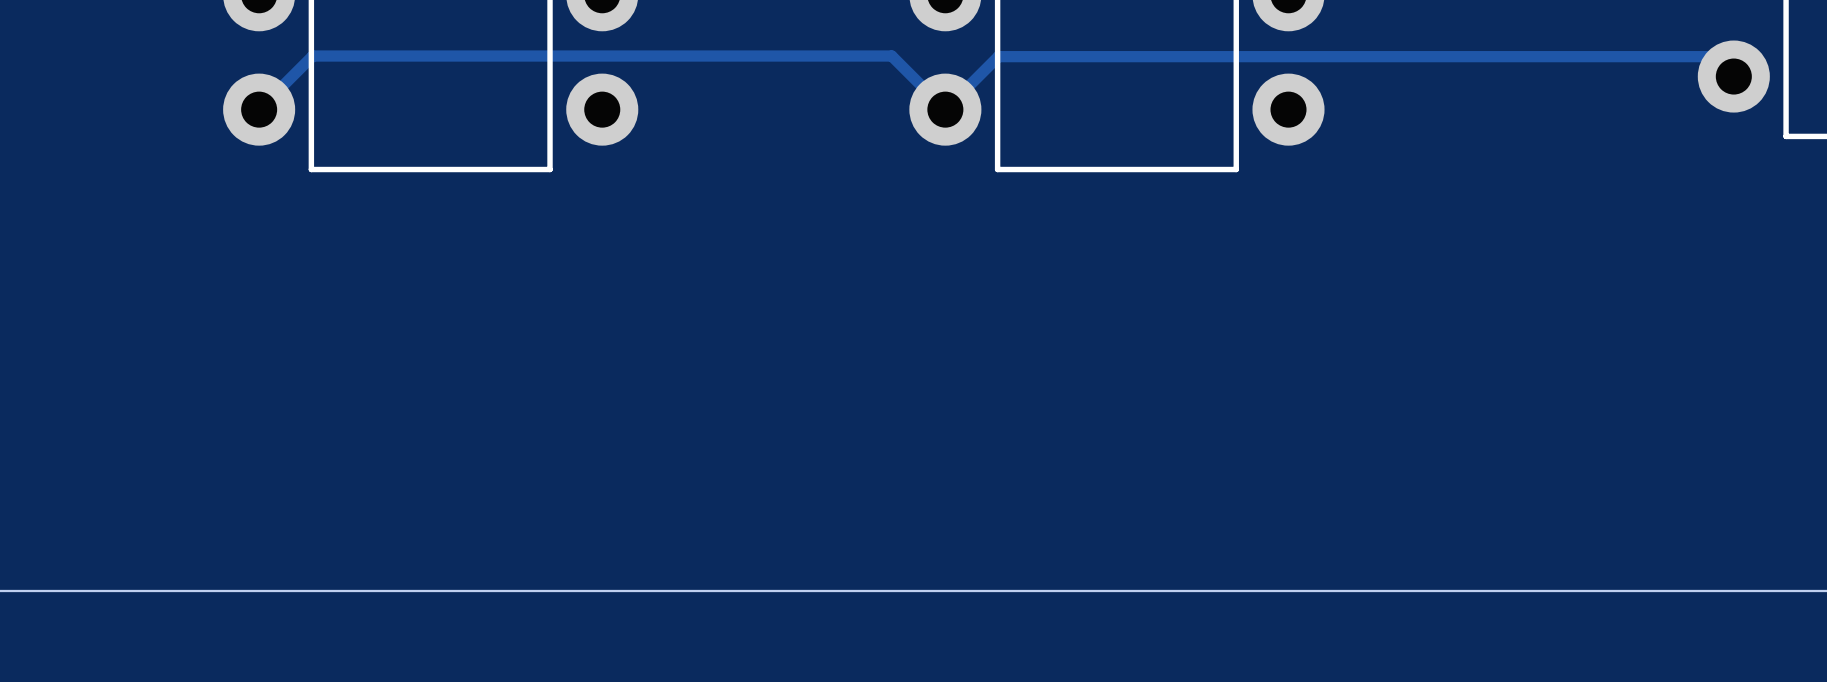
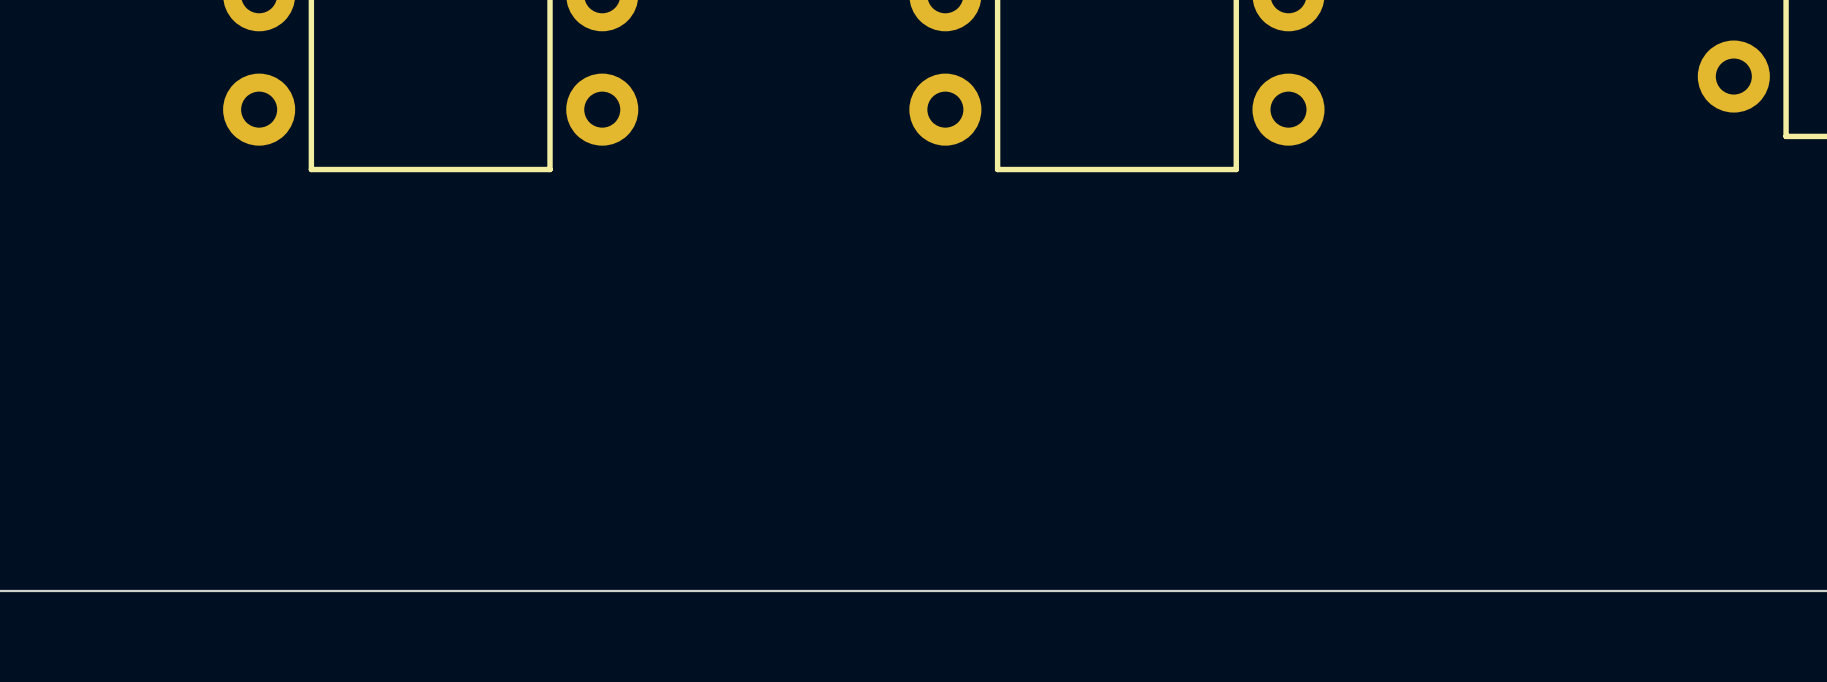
track: (1733, 76) (1713, 56) (998, 56) (945, 109) (891, 56) (312, 56) (259, 109) -> none

